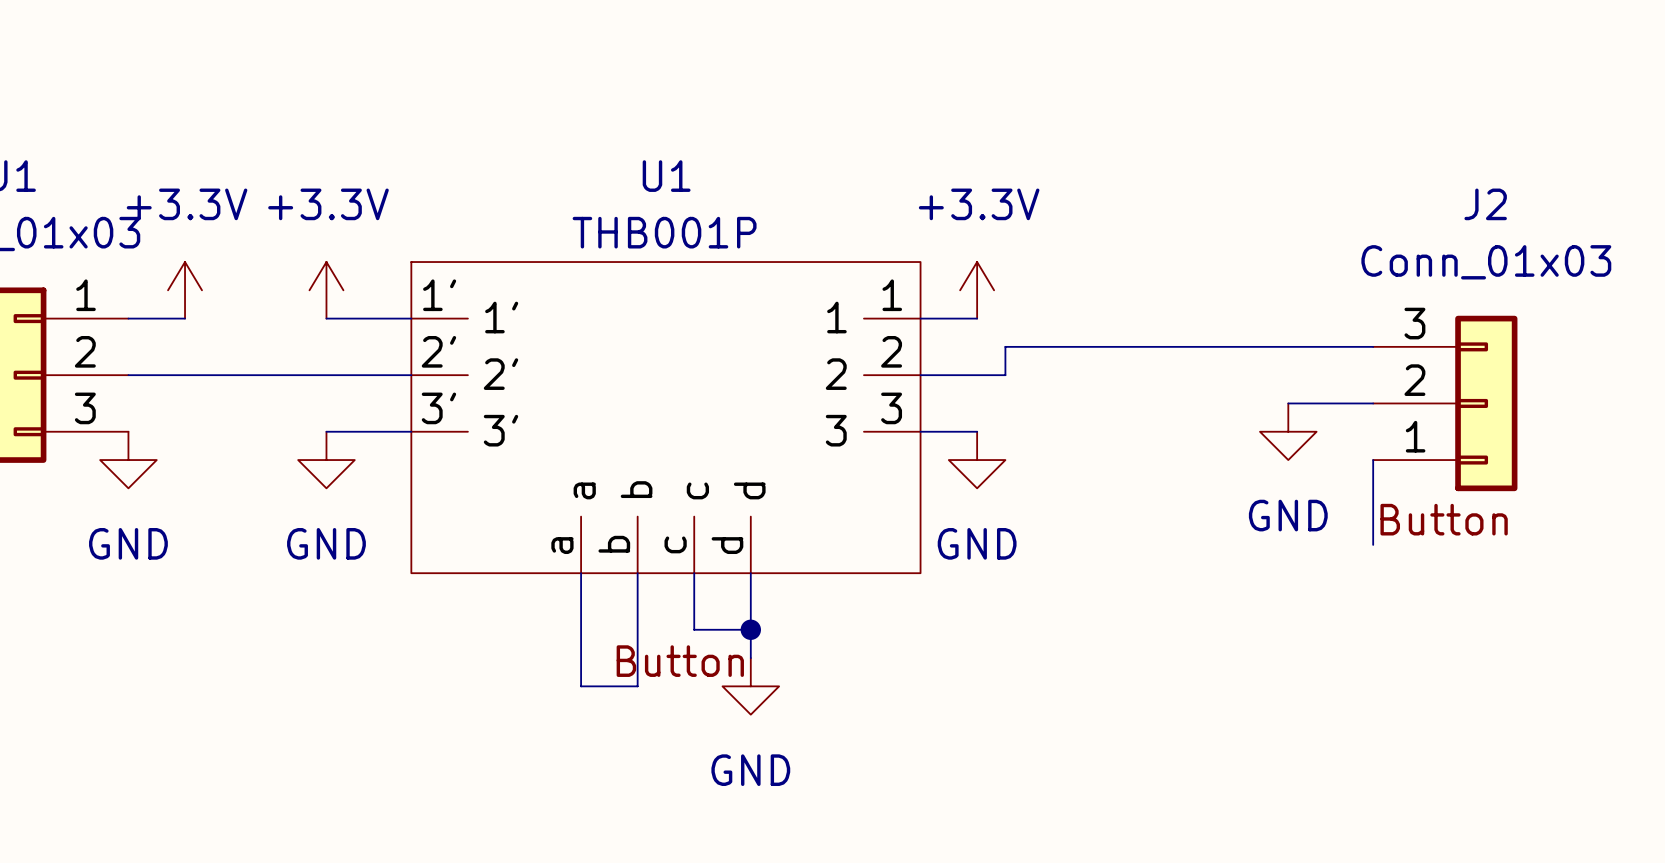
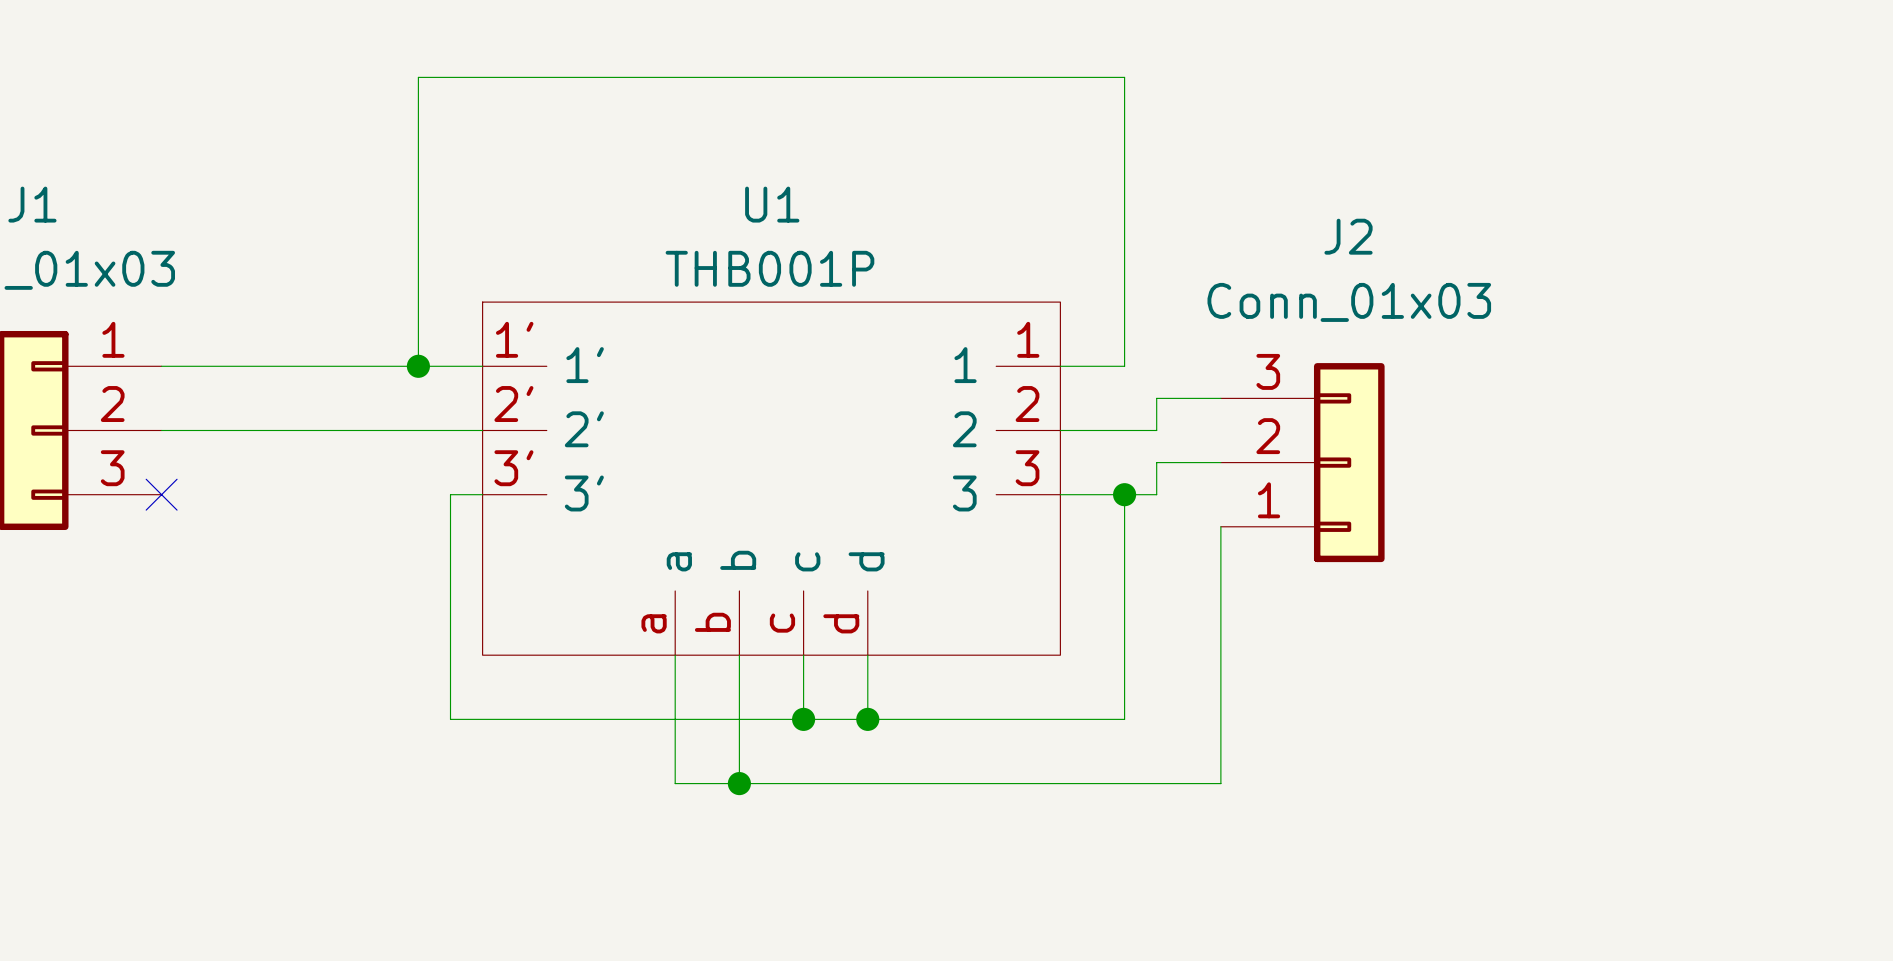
power symbol: +3.3V (185, 290) -> none
power symbol: +3.3V (326, 290) -> none
power symbol: +3.3V (977, 290) -> none
wire: none -> (225, 366) (386, 366)
wire: none -> (418, 366) (418, 77) (1124, 77) (1124, 366)
junction: none -> (418, 366)
wire: (1061, 346) (1373, 346) -> none
wire: (1288, 403) (1373, 403) -> none
J2 position: (1445, 403) -> (1302, 462)
no-connect mark: none -> (161, 494)
wire: (326, 431) (383, 431) -> (803, 719) (450, 719) (450, 494)
junction: none -> (1124, 494)
power symbol: GND (1288, 431) -> none
power symbol: GND (128, 460) -> none
power symbol: GND (326, 460) -> none
power symbol: GND (977, 460) -> none
wire: none -> (1220, 526) (1220, 783) (739, 783)
wire: (1373, 460) (1373, 544) -> none
label: Button (1444, 519) -> none
junction: none -> (803, 719)
wire: (750, 629) (750, 658) -> (867, 719) (1124, 719) (1124, 494) (1156, 494) (1156, 462) (1220, 462)
label: Button (680, 661) -> none
junction: none -> (739, 783)
power symbol: GND (750, 686) -> none

